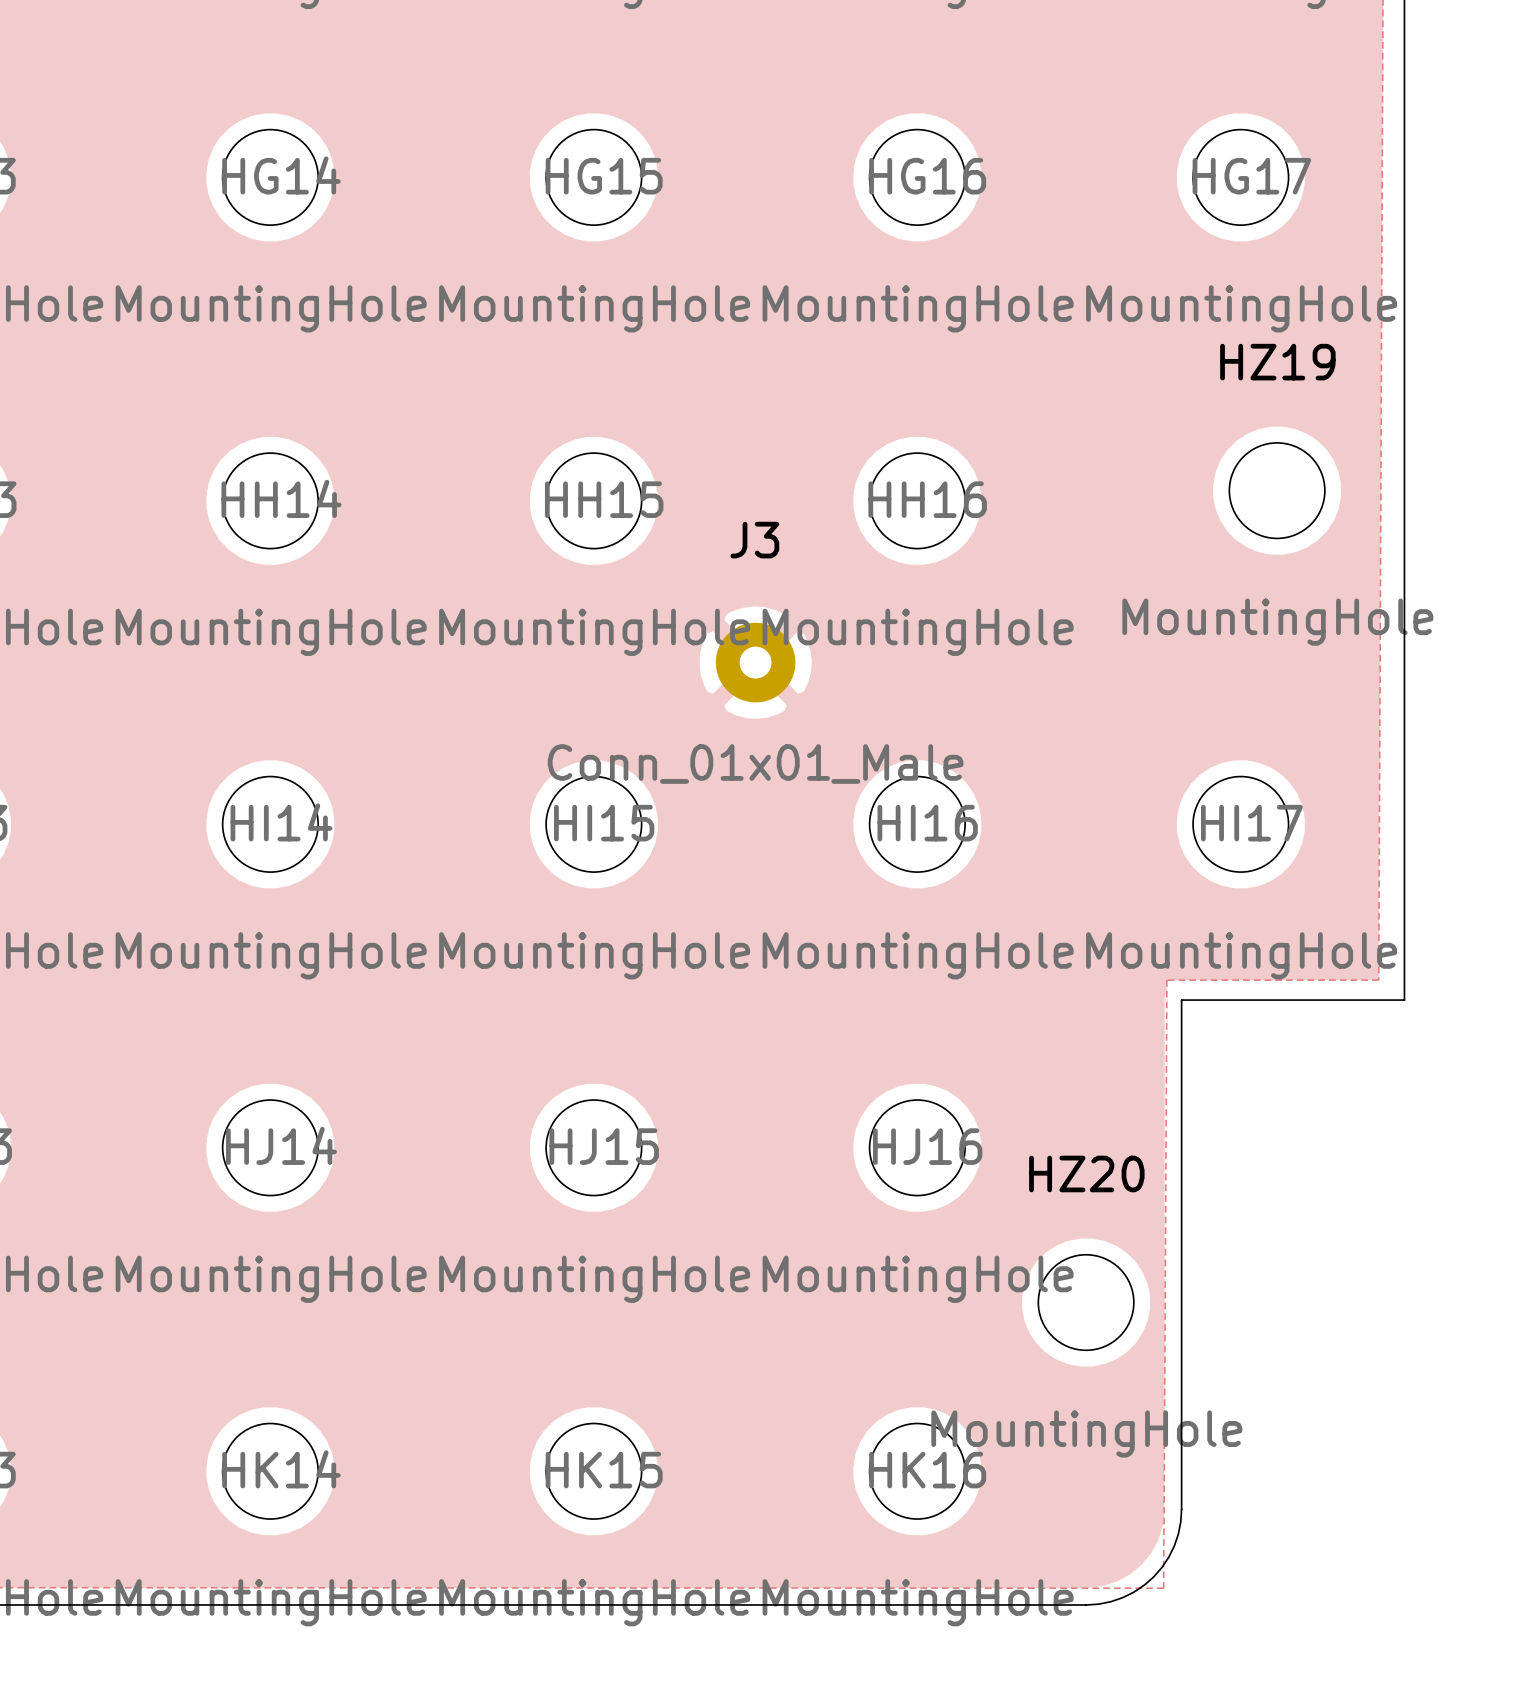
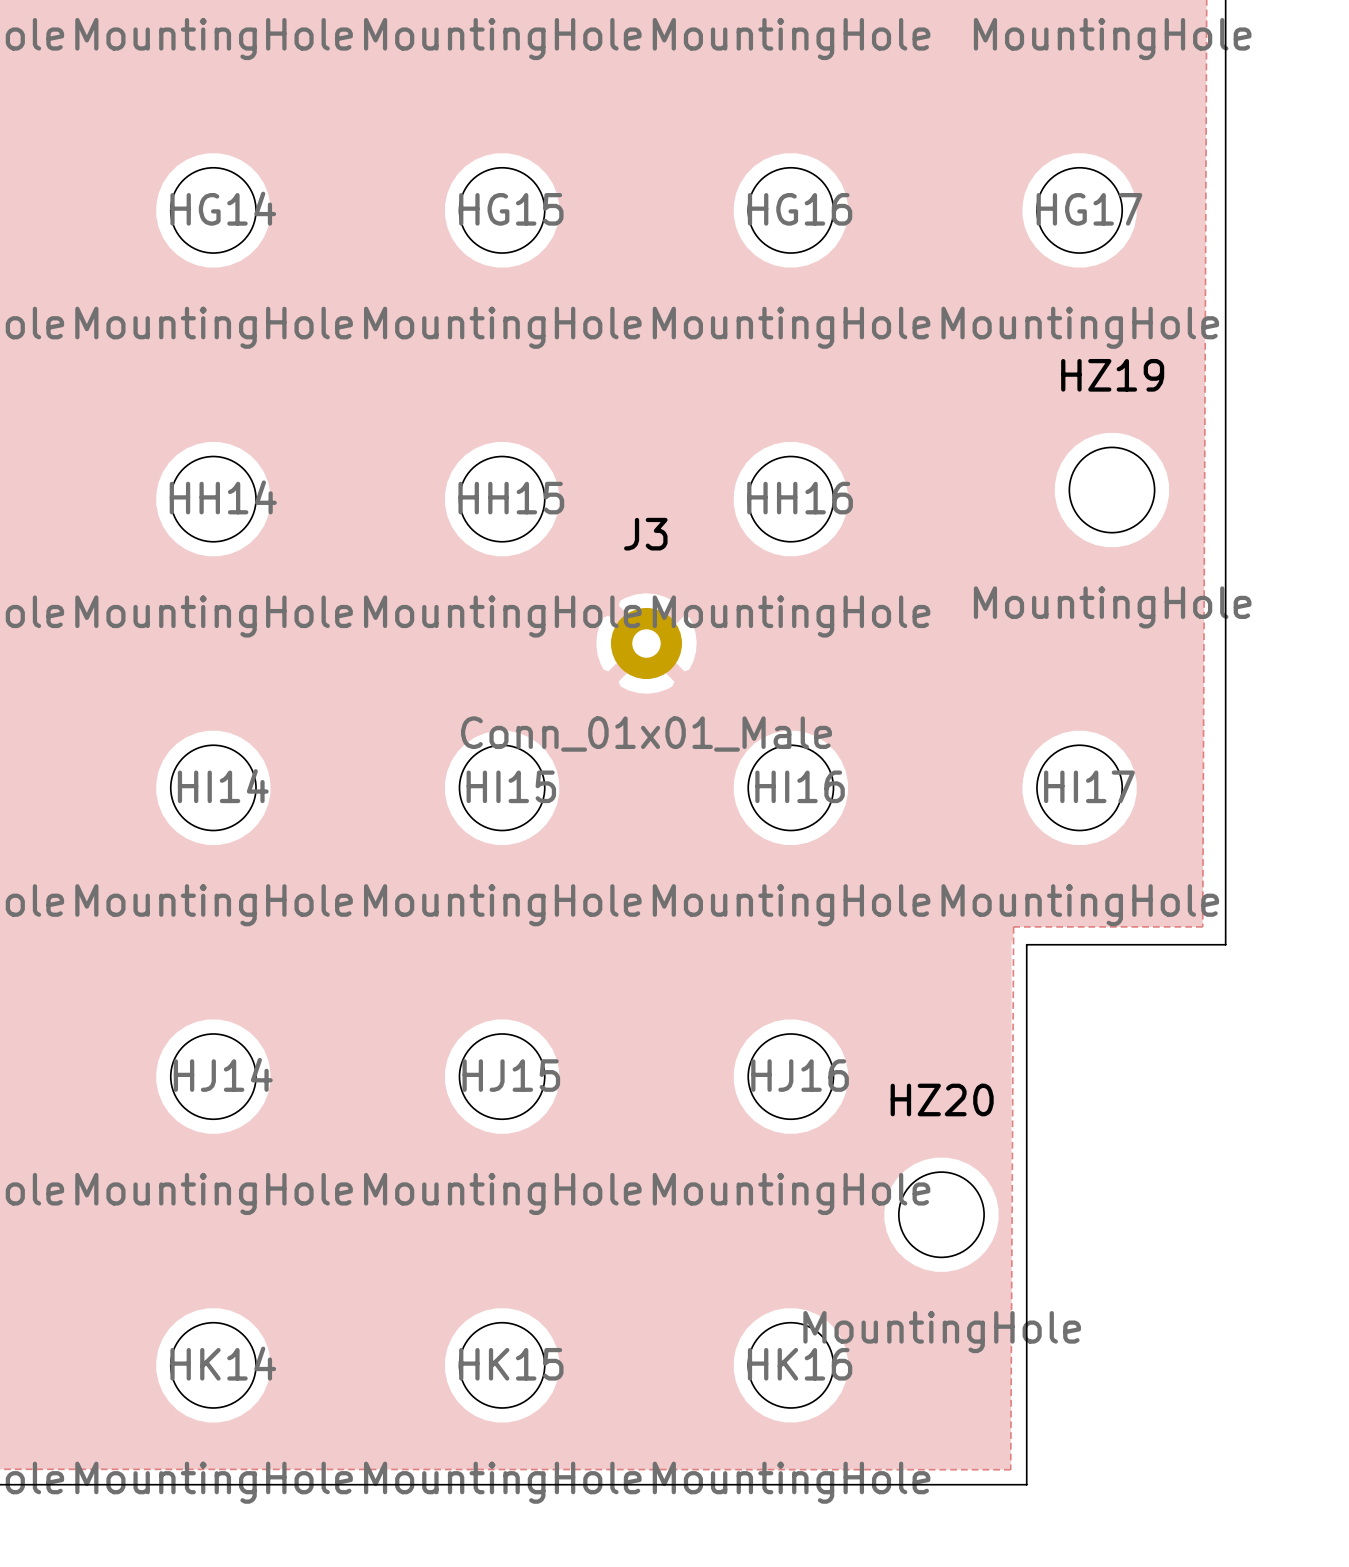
board edge: (1181, 1509) (1178, 1534) (1174, 1546) (1161, 1567) (1153, 1577) (1144, 1585) (1122, 1597) (1098, 1604) (1086, 1604) -> (1026, 1399) (1026, 1484) (941, 1484)

